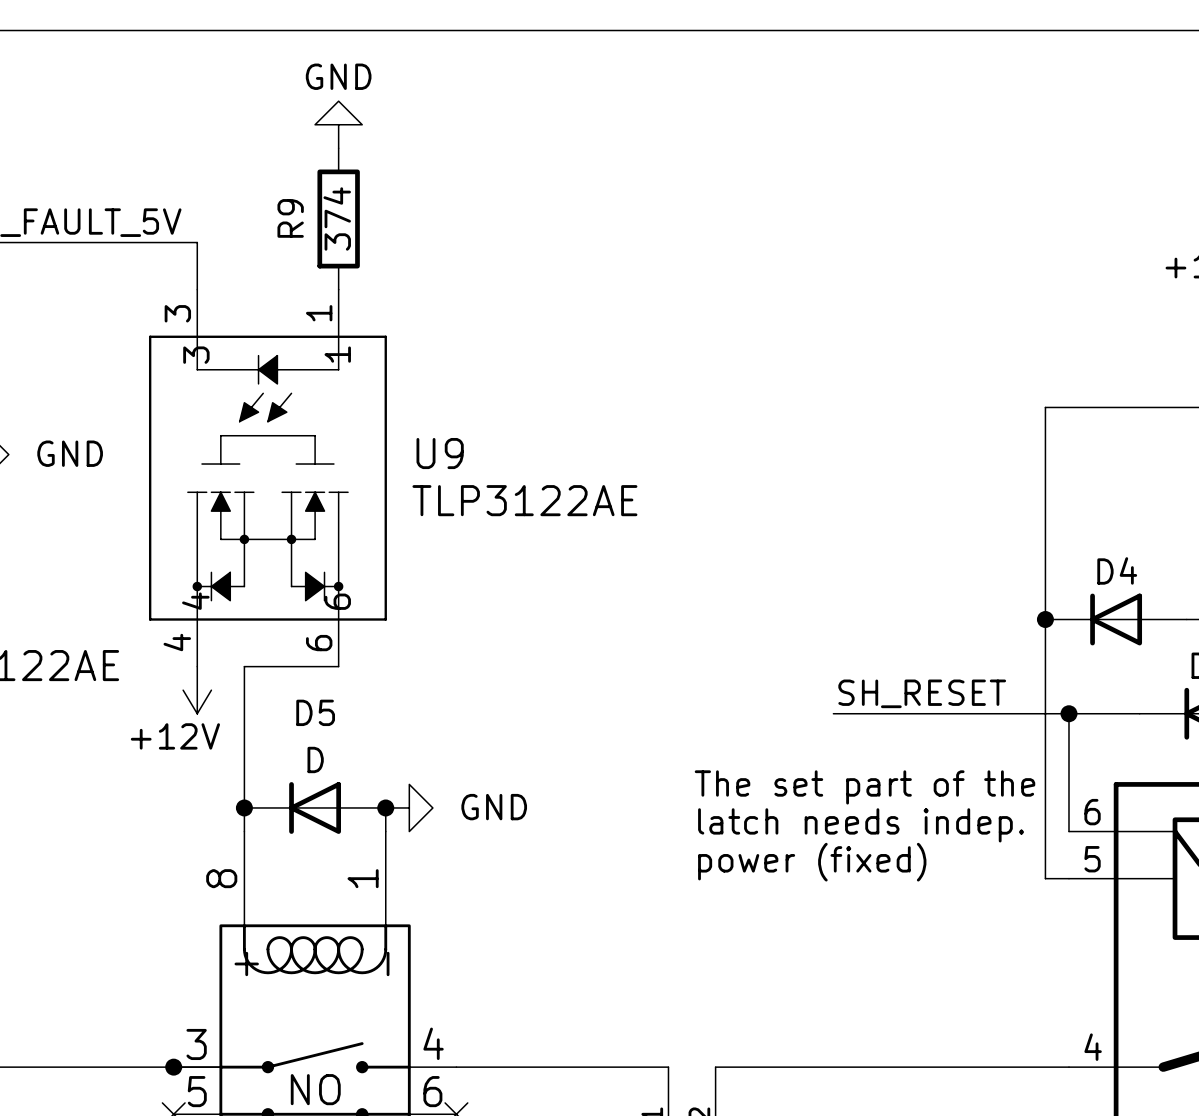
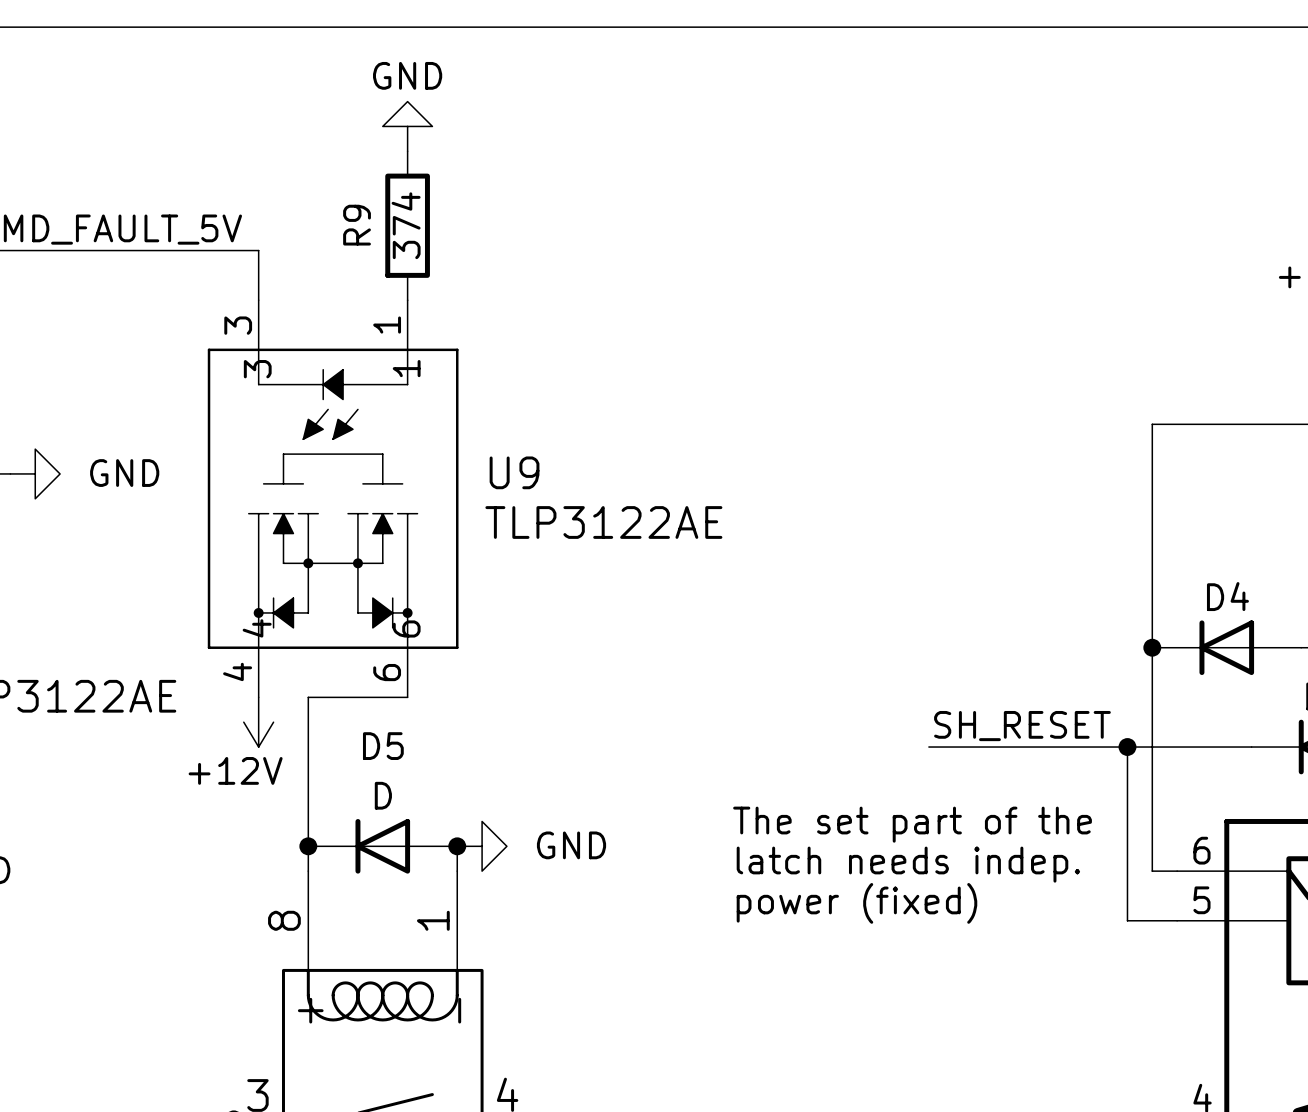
wire: none -> (1127, 747) (1127, 920) (1152, 920)
wire: (1068, 713) (1068, 831) -> none
junction position: (1068, 713) -> (1127, 747)
text position: The set part of the (864, 787) -> The set part of the (912, 824)
text position: latch needs indep. (861, 825) -> latch needs indep. (908, 864)
wire: (1045, 831) (1045, 878) -> (1152, 871) (1177, 871)
text position: power (fixed) (812, 862) -> power (fixed) (856, 903)

